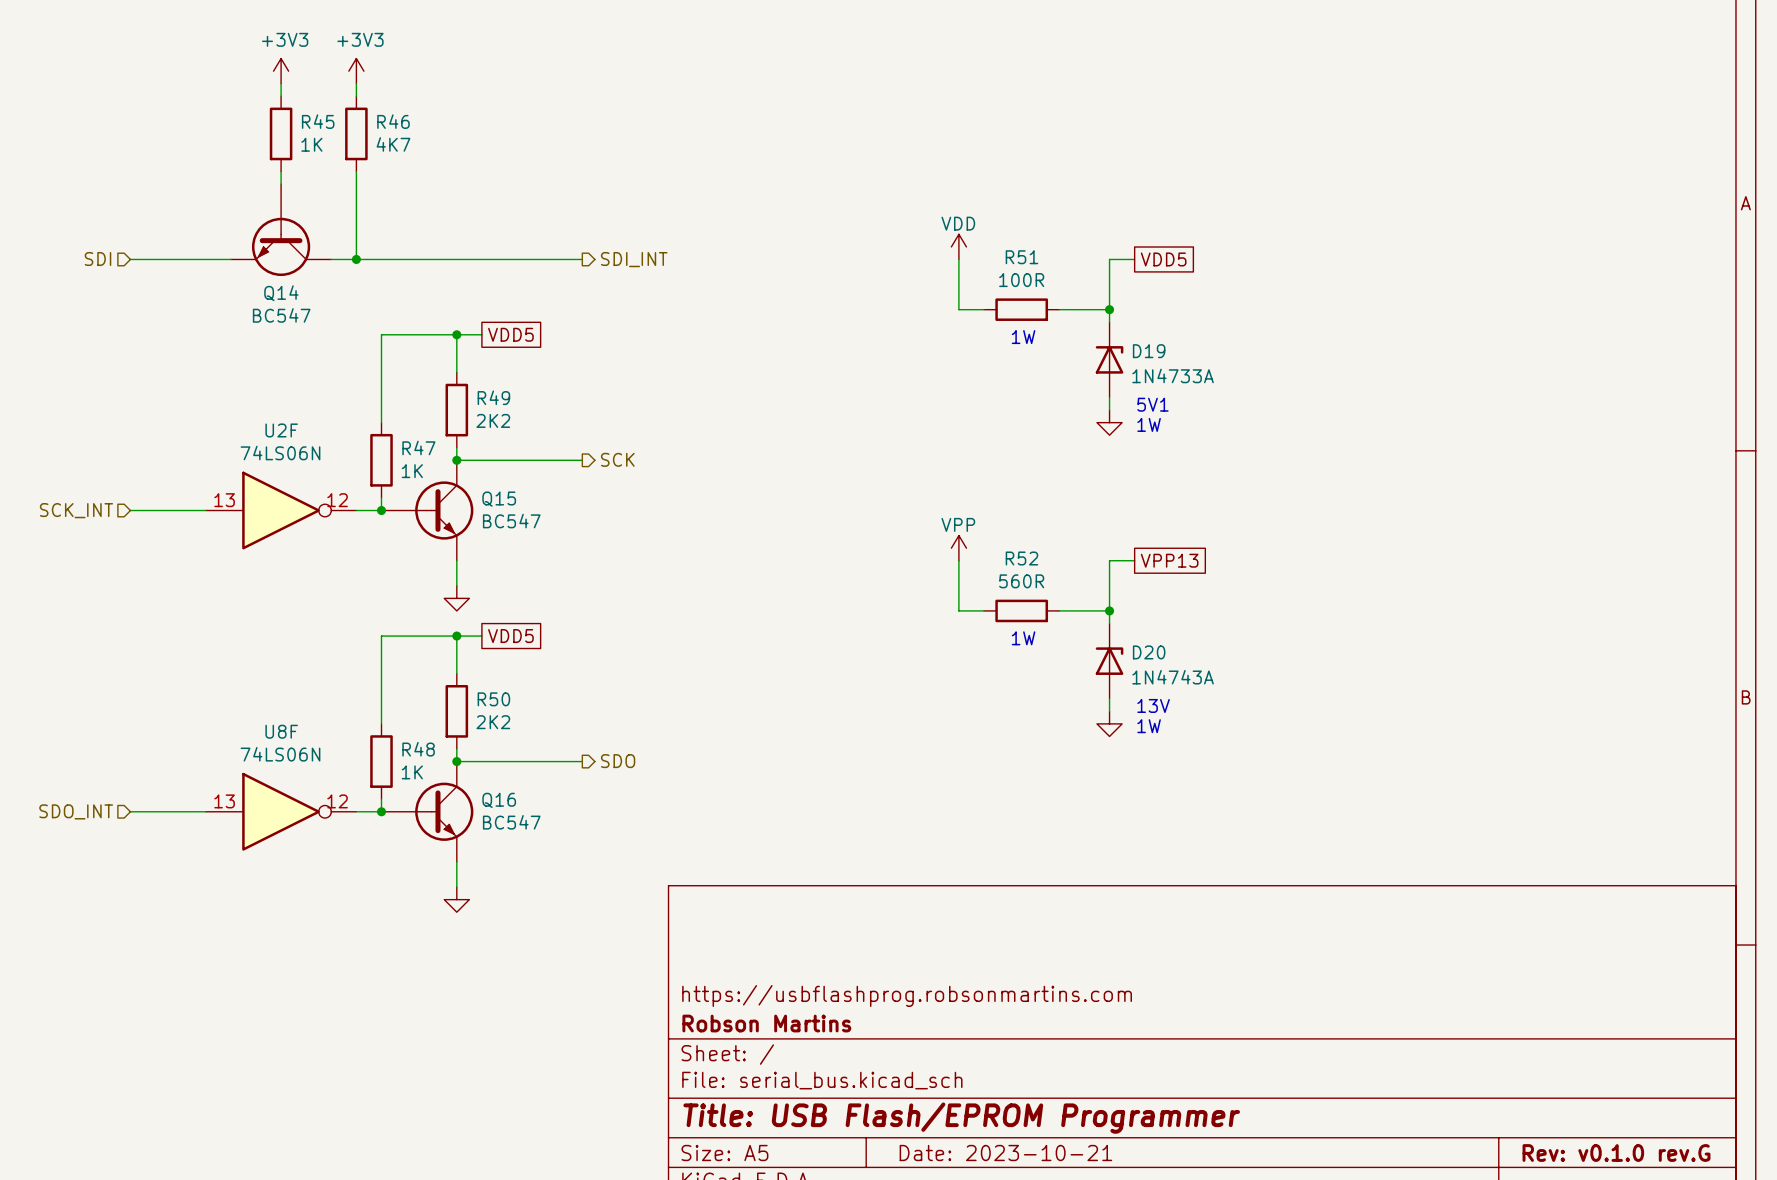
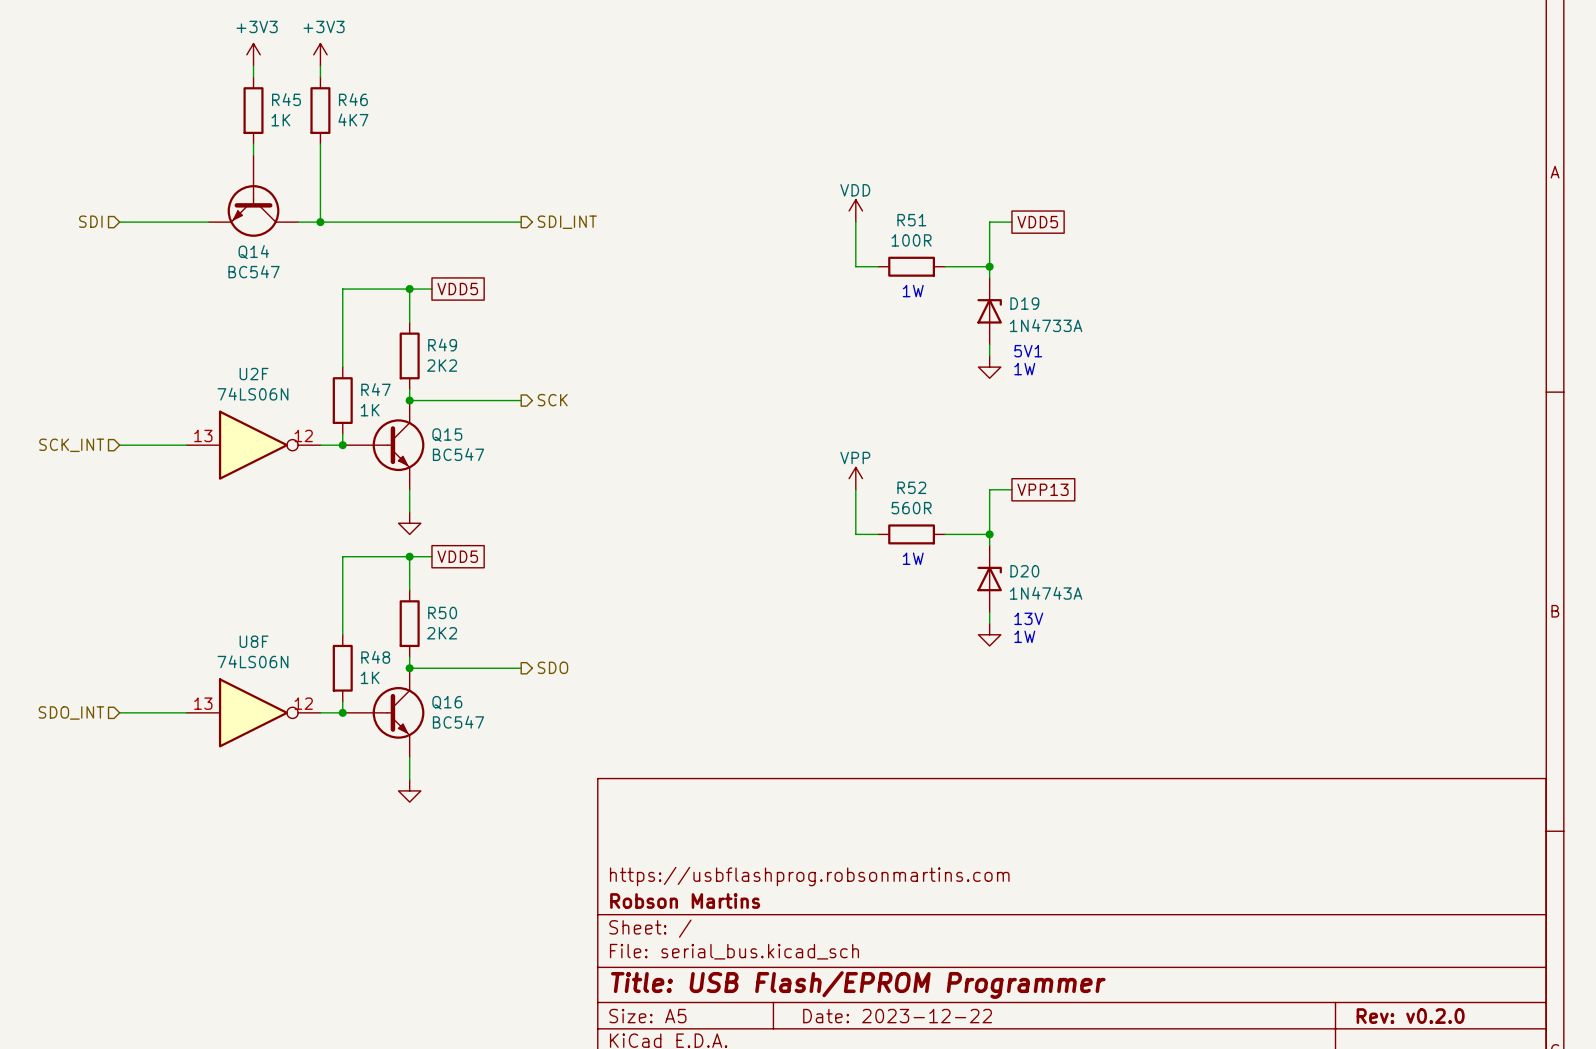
title block: Date: 2023-10-21 (1005, 1153) -> Date: 2023-12-22 (897, 1016)
title block: Rev: v0.1.0 rev.G (1616, 1153) -> Rev: v0.2.0 (1410, 1016)

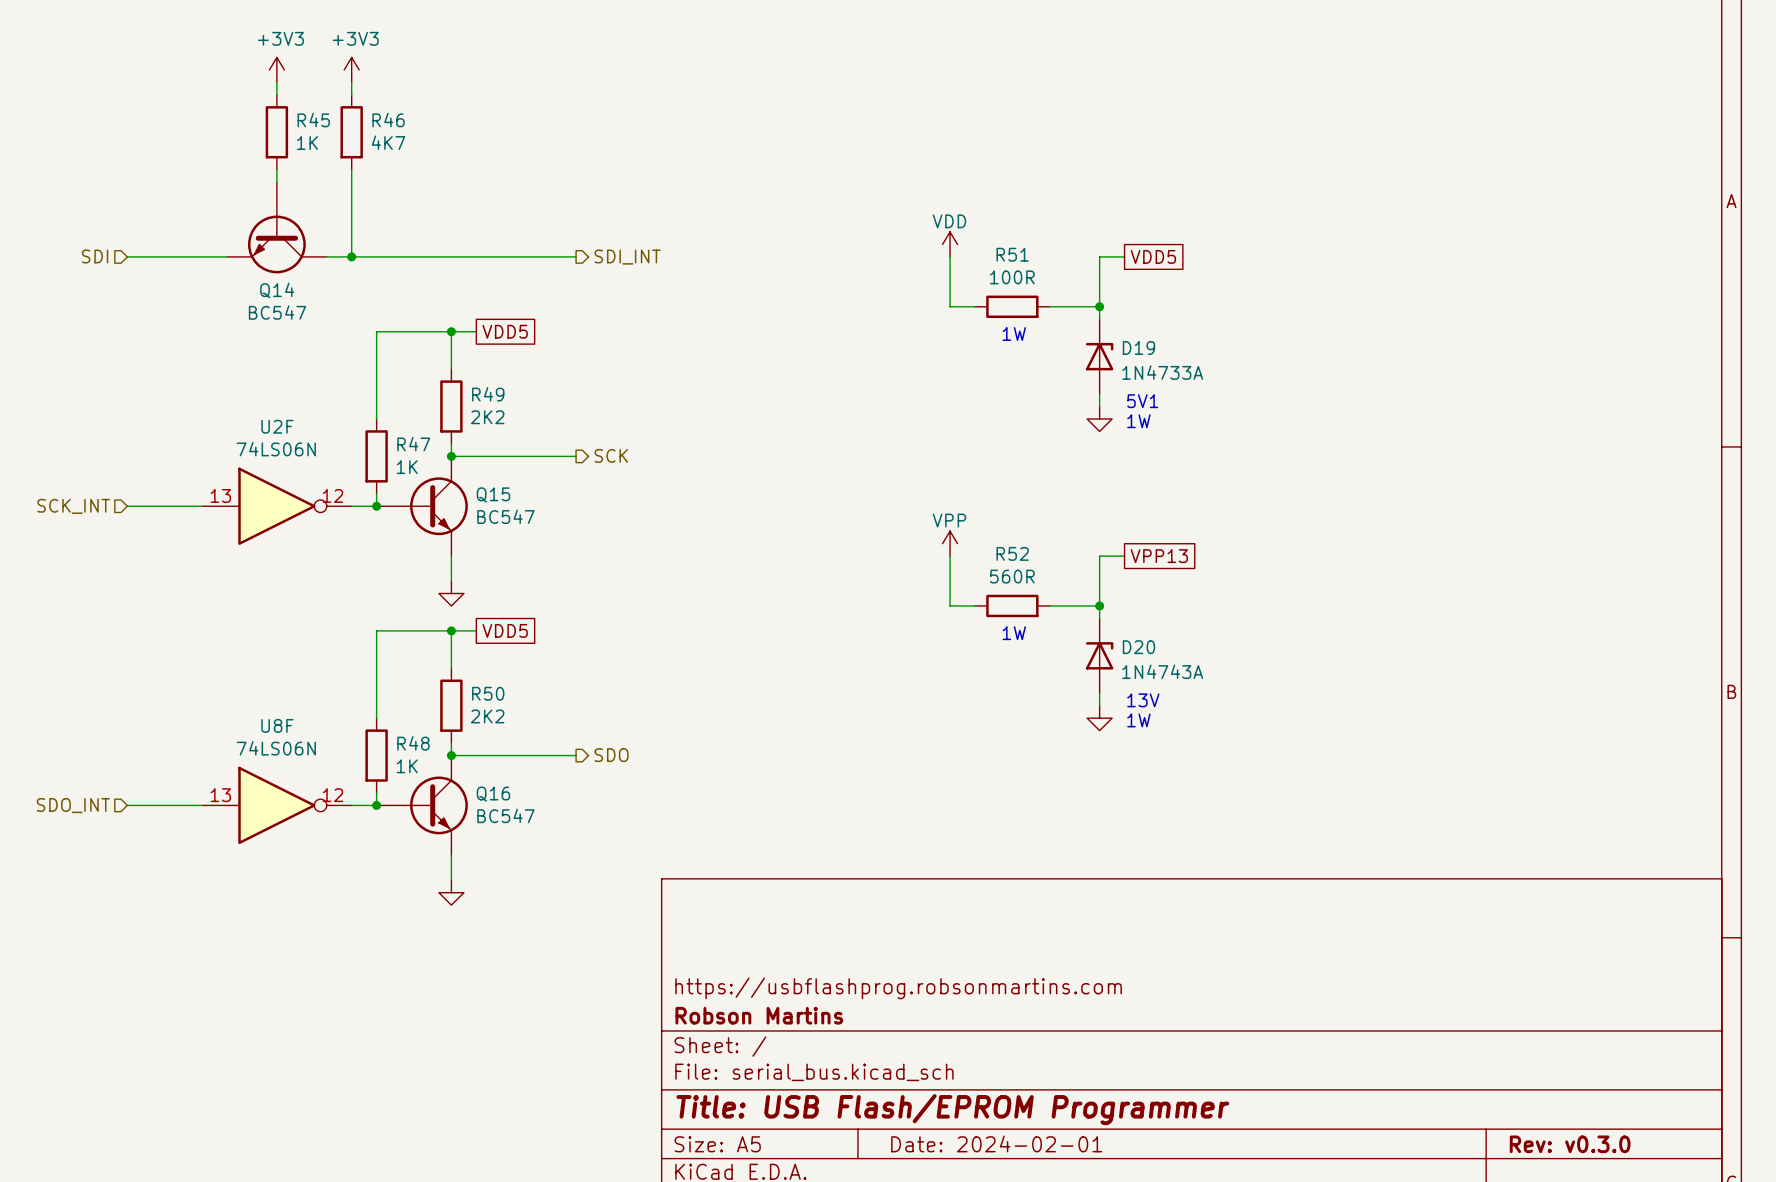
title block: Date: 2023-12-22 (897, 1016) -> Date: 2024-02-01 (996, 1143)
title block: Rev: v0.2.0 (1410, 1016) -> Rev: v0.3.0 (1570, 1144)

